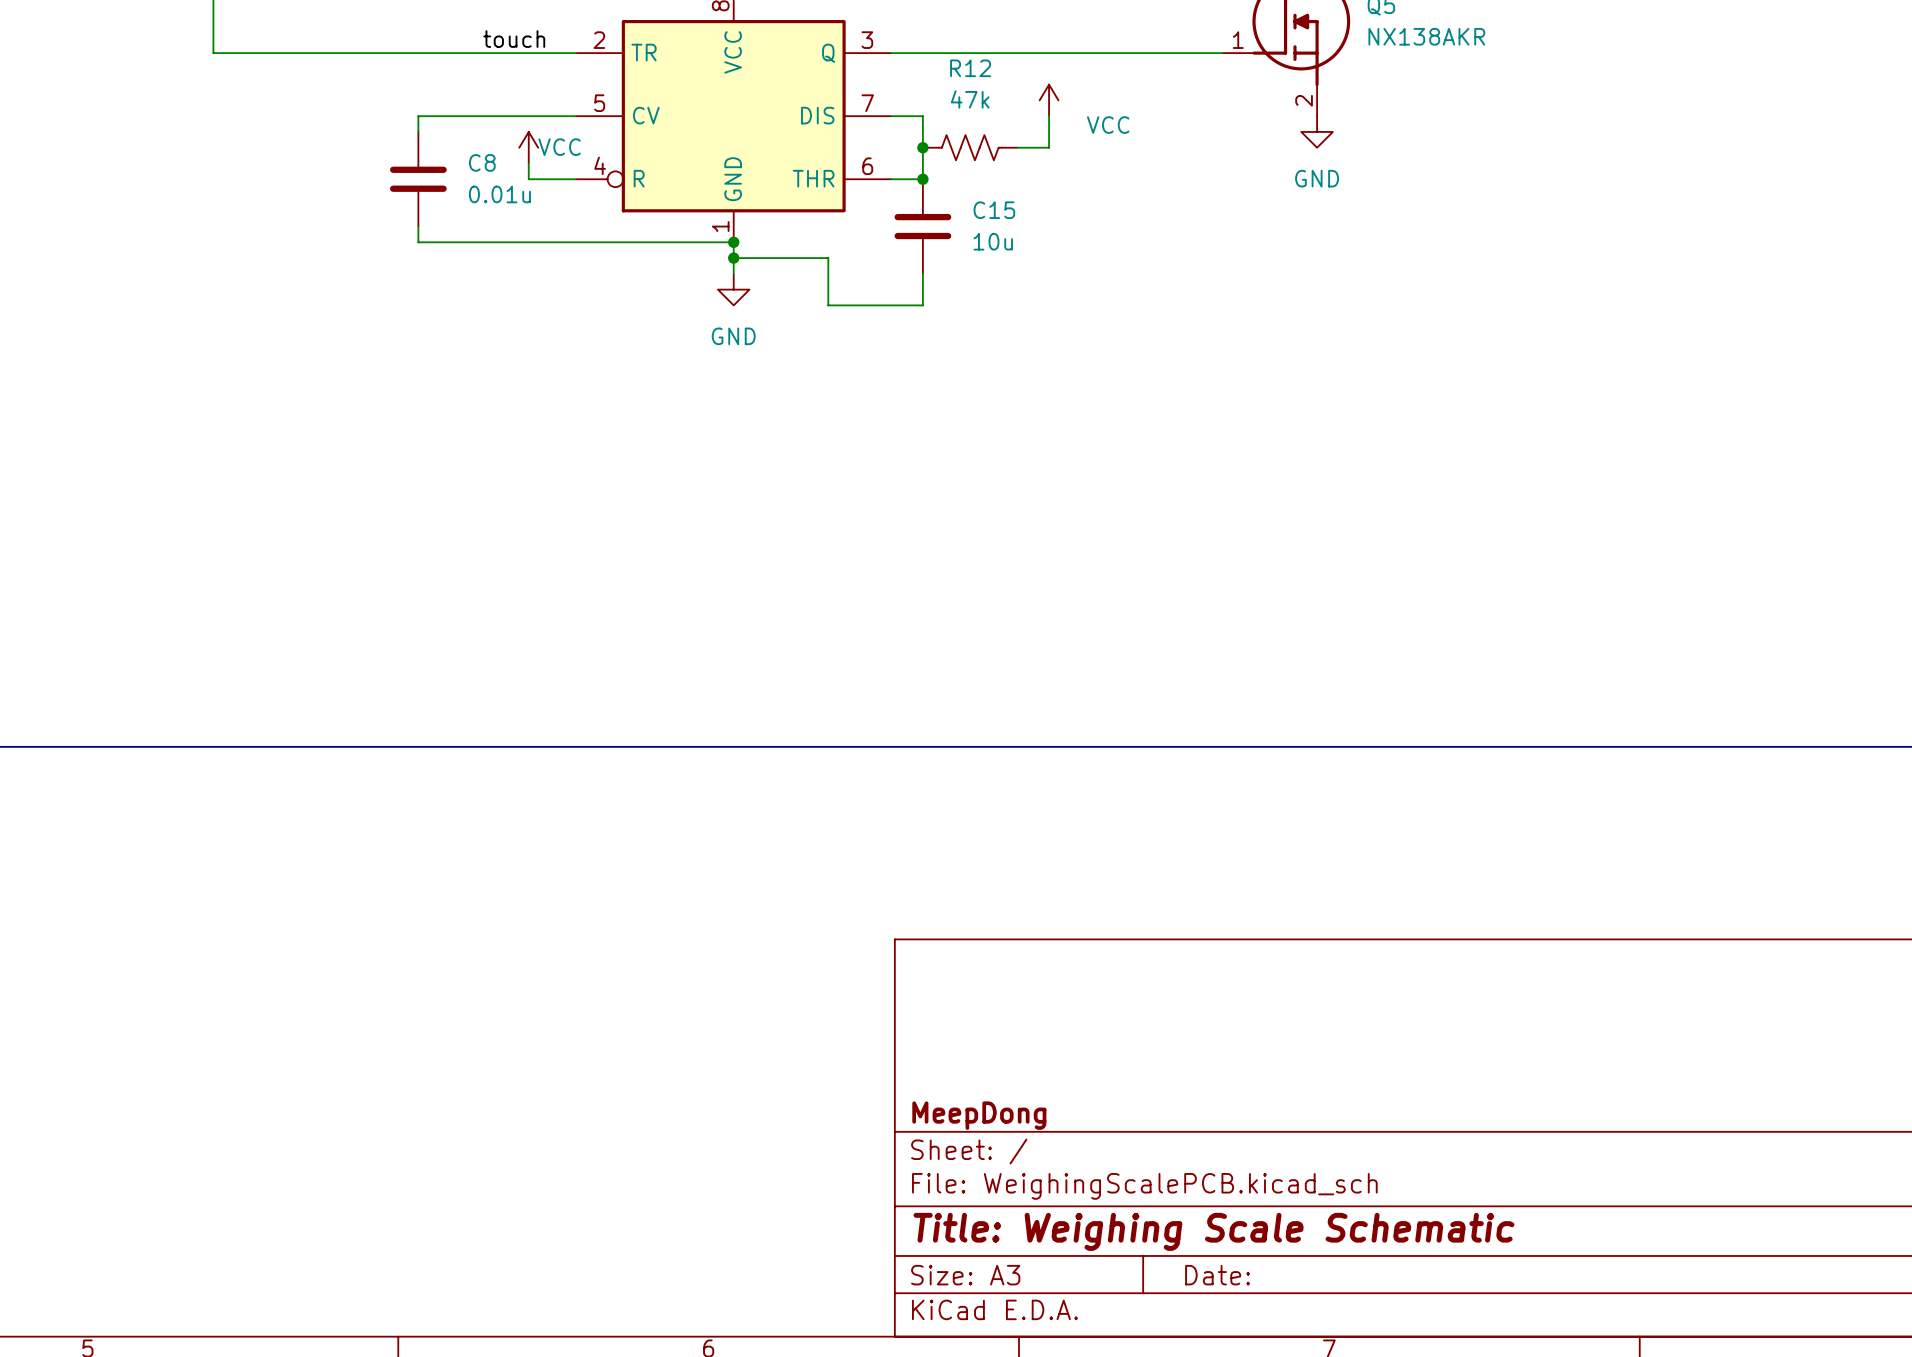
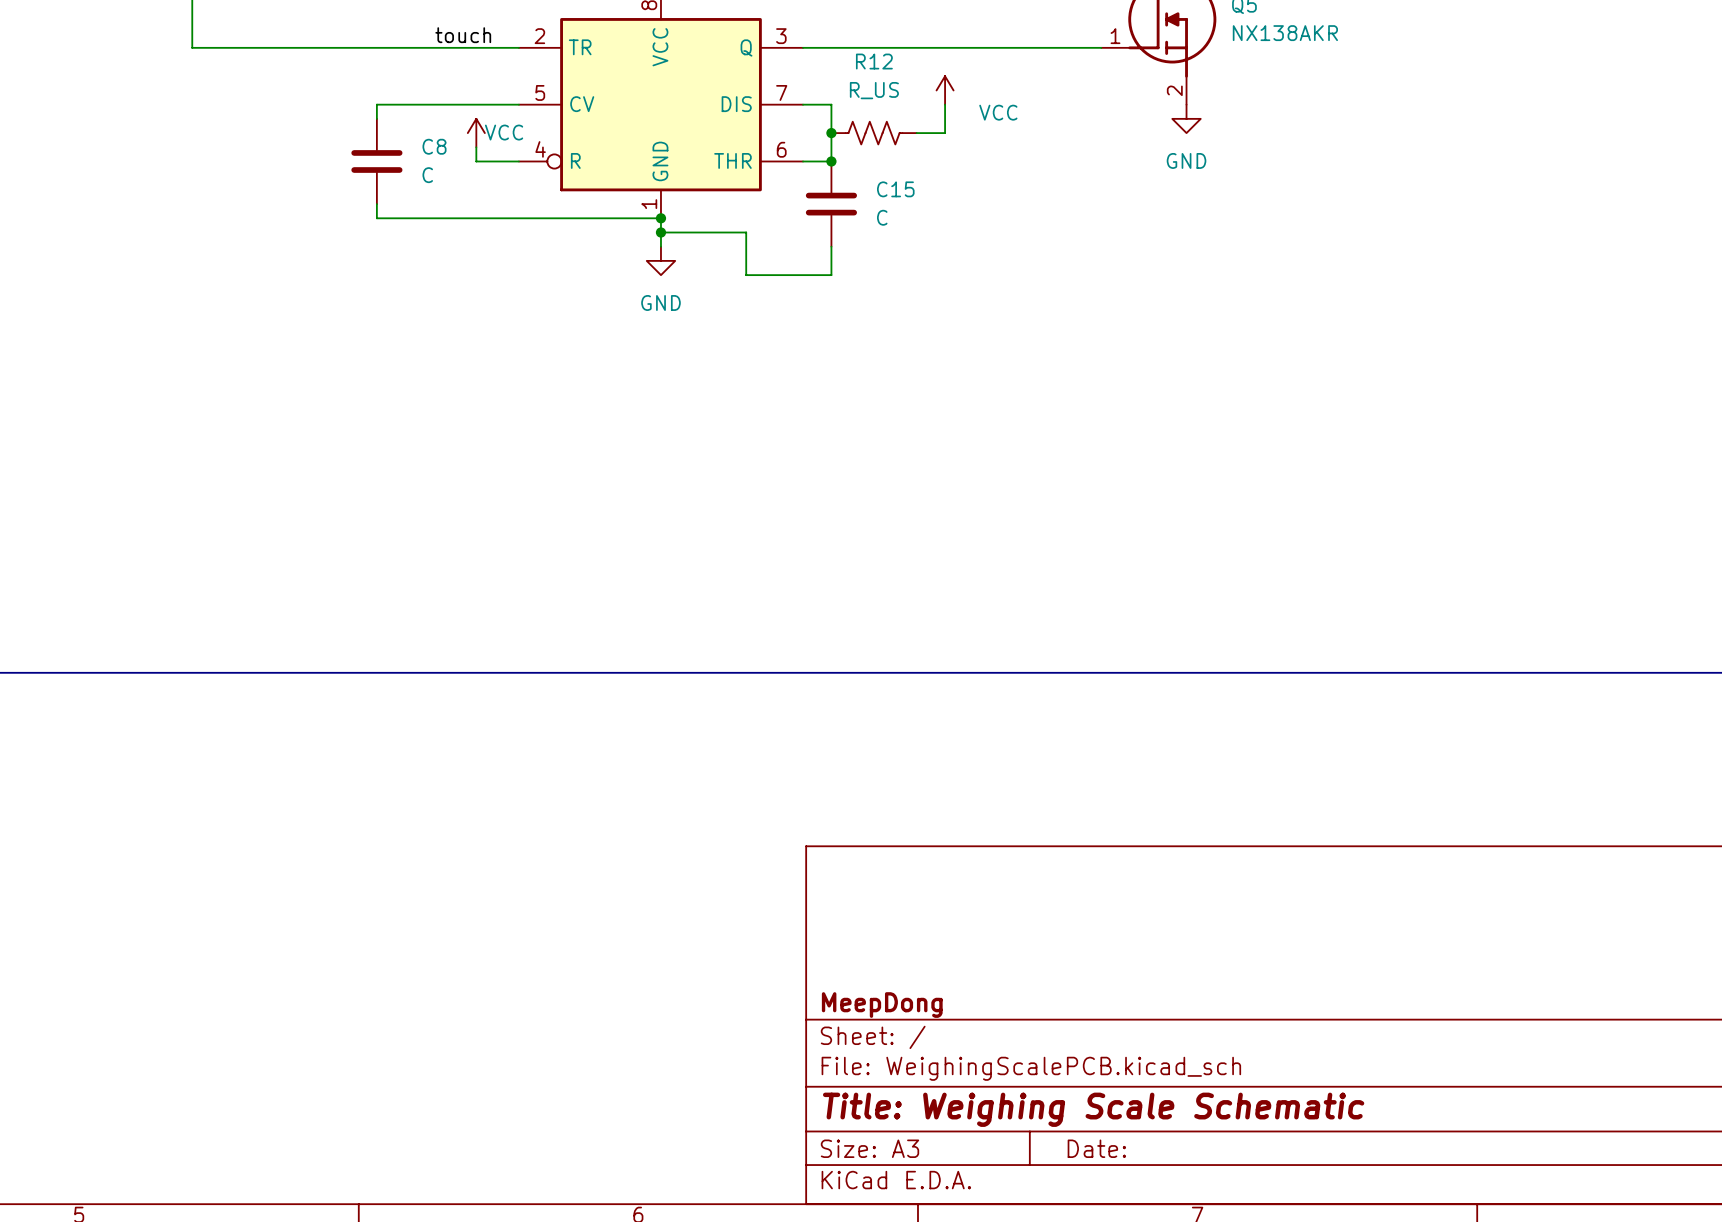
R12 value: 47k (970, 99) -> R_US (874, 90)
C8 value: 0.01u (499, 194) -> C (427, 175)
C15 value: 10u (993, 241) -> C (882, 217)

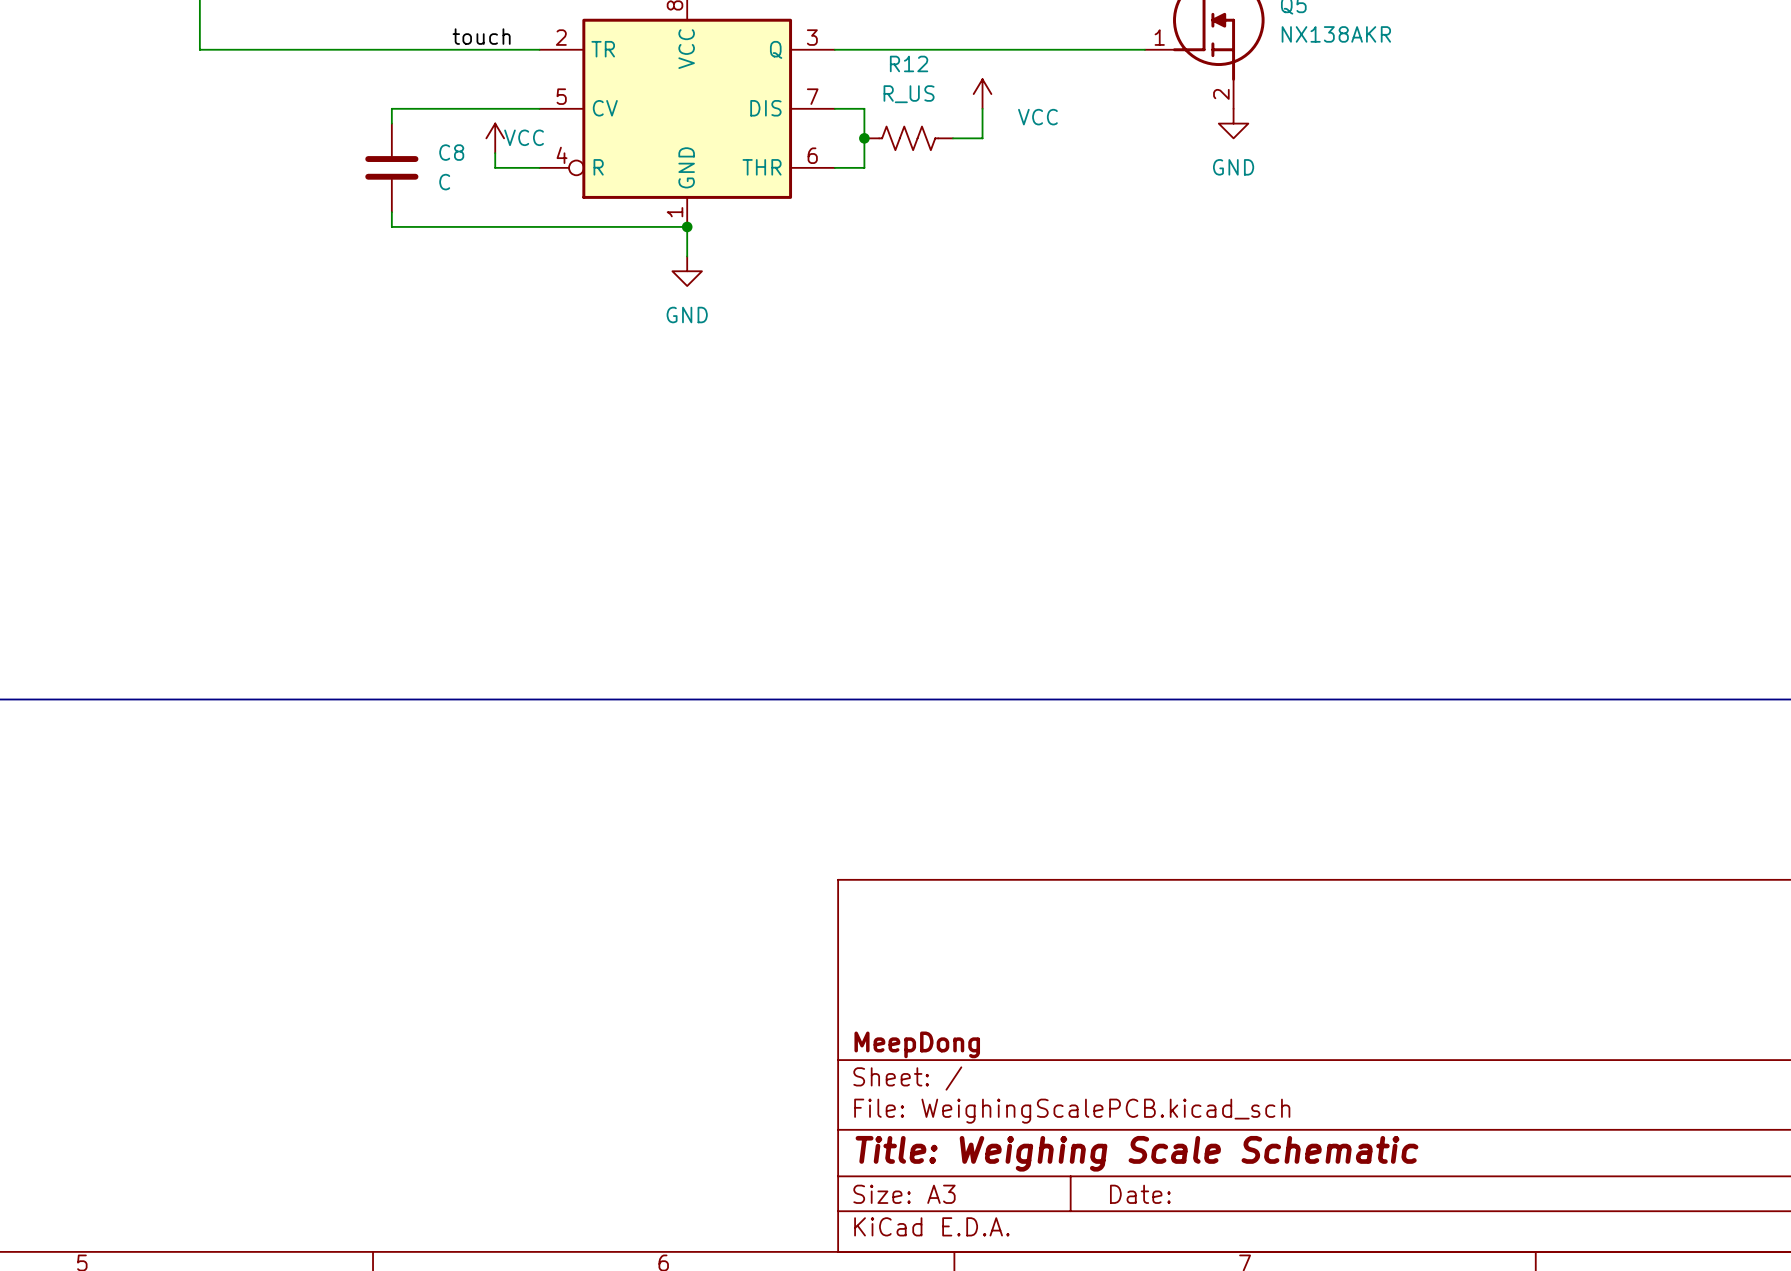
junction: (831, 161) -> none
C15: C (831, 204) -> none
wire: (660, 232) (746, 232) (746, 275) (831, 275) (831, 246) -> none
junction: (660, 232) -> none

